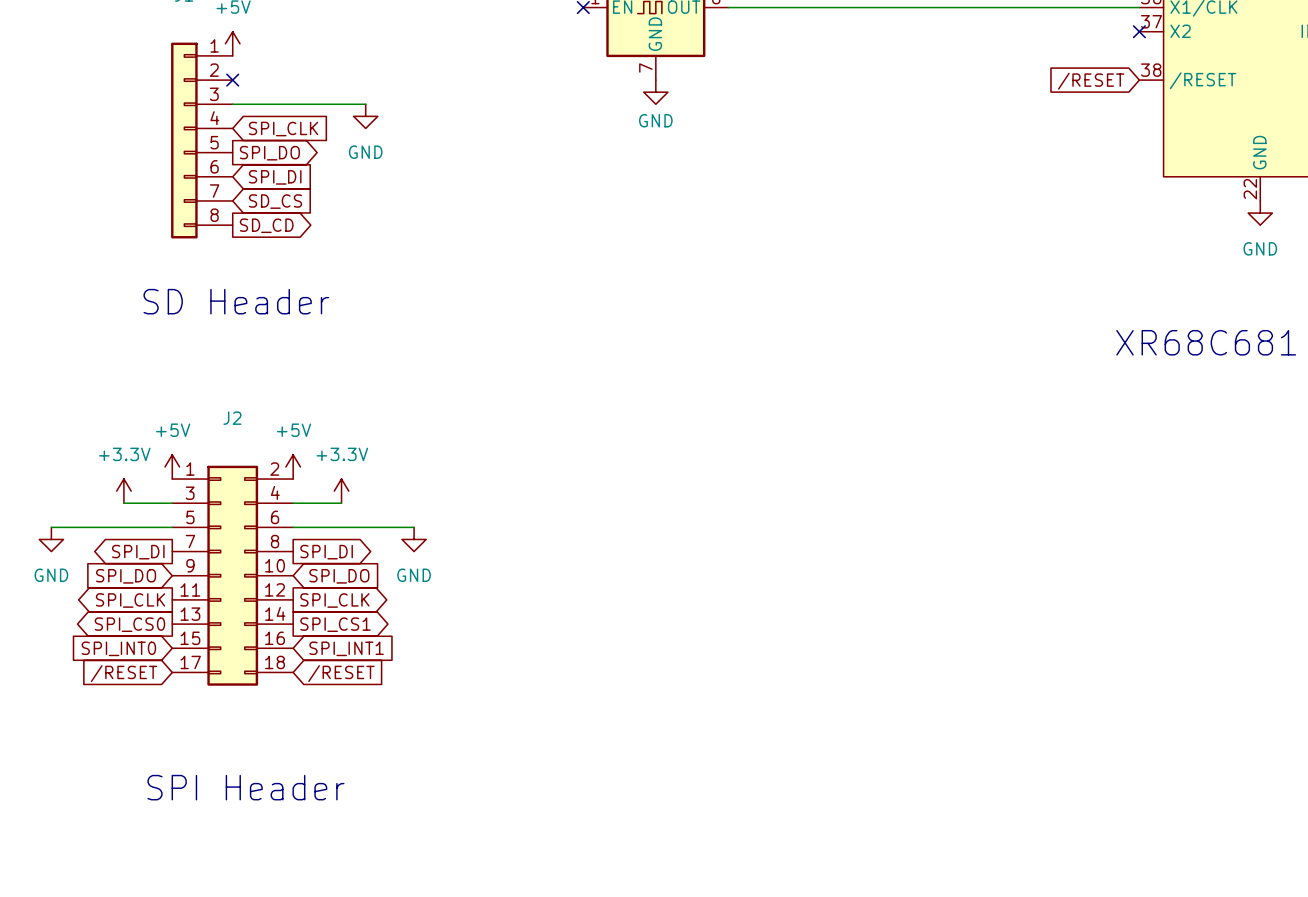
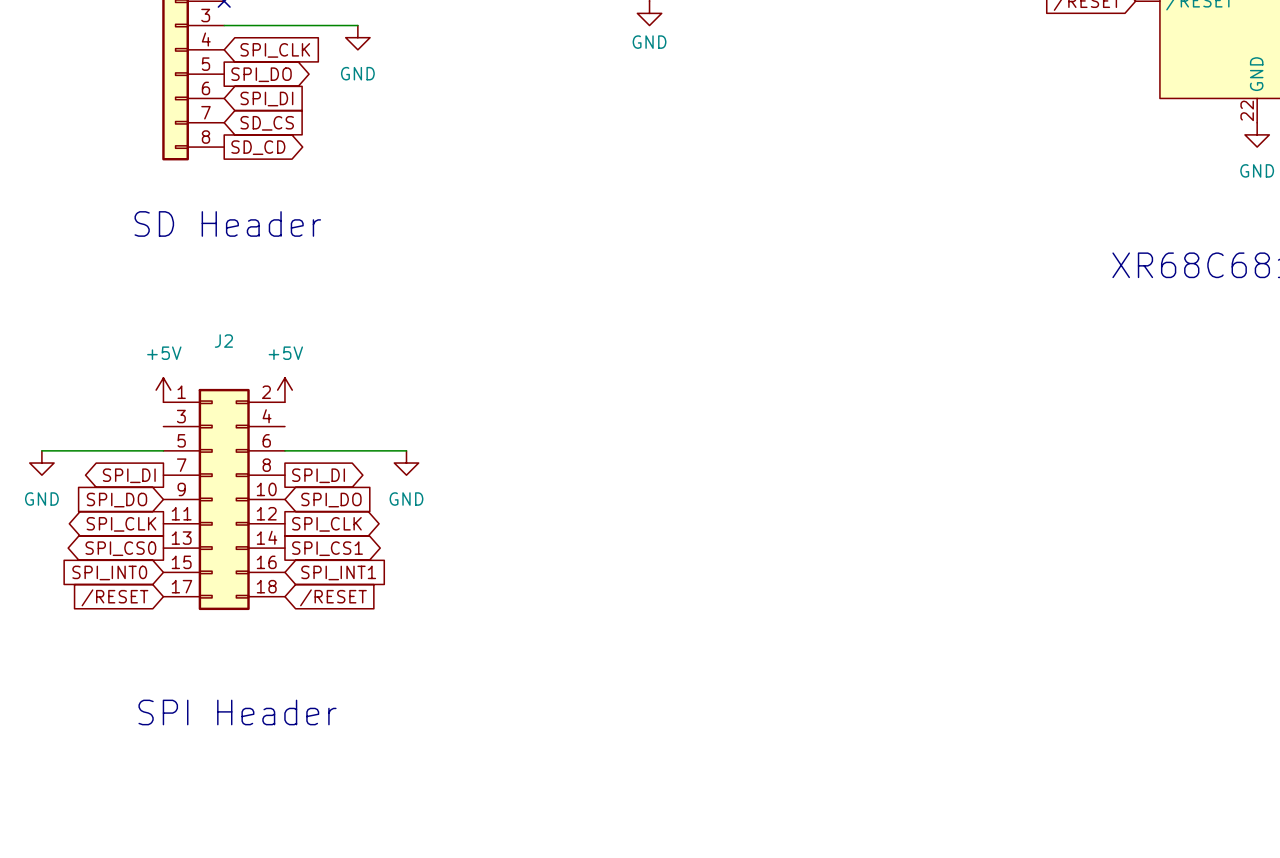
power symbol: +3.3V (123, 491) -> none
power symbol: +3.3V (341, 491) -> none
wire: (123, 503) (172, 503) -> none
wire: (293, 503) (341, 503) -> none

